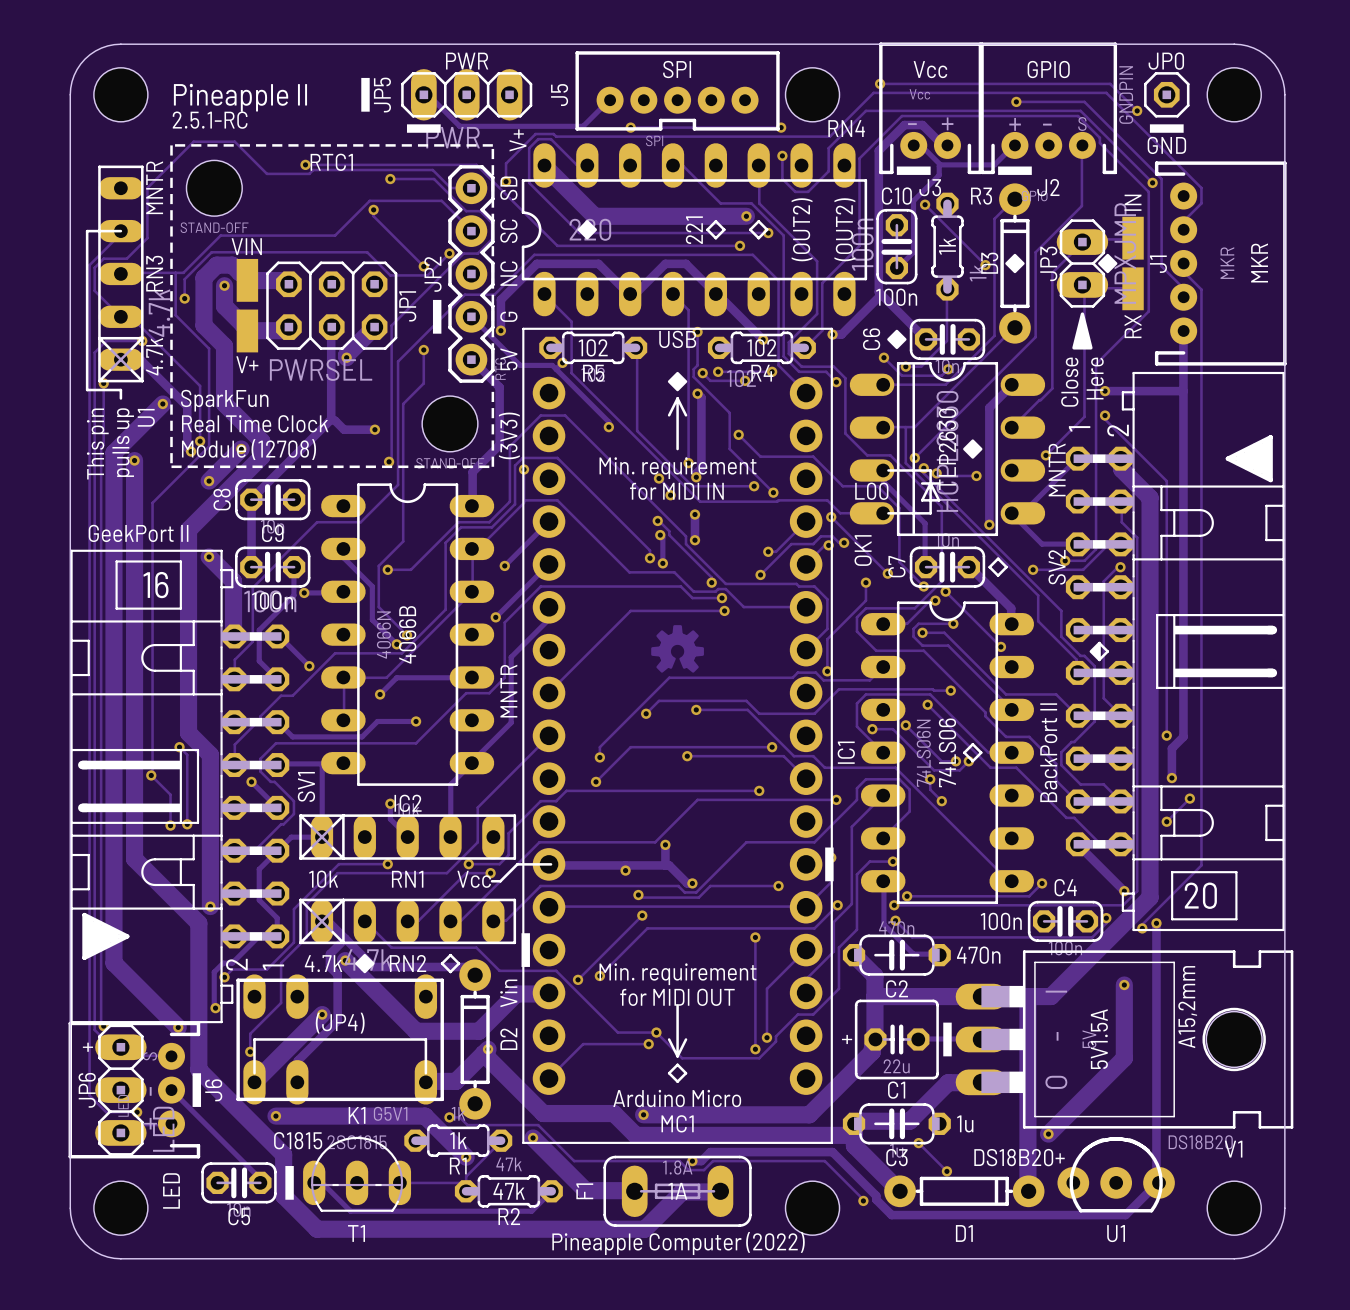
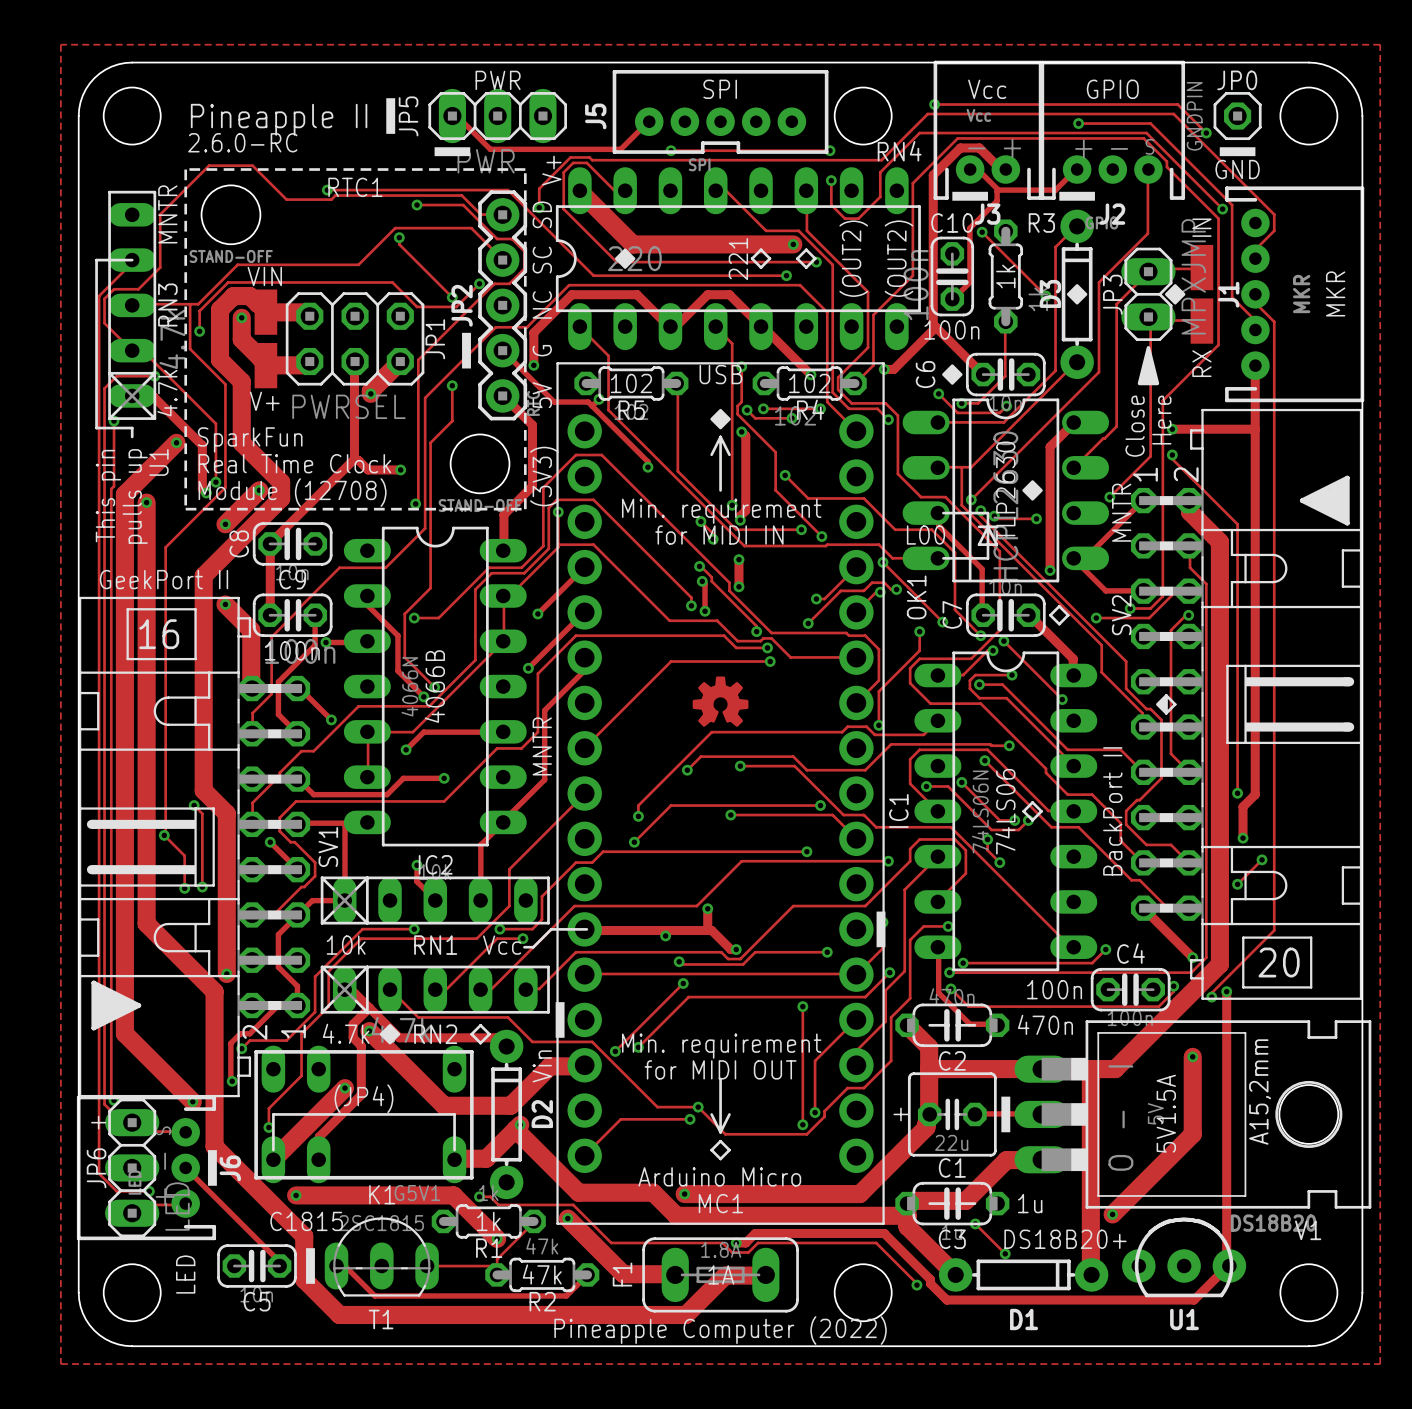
zone outline: none -> (60, 44) (1380, 44) (1380, 1364) (60, 1364) (60, 44)
text: 2.5.1-RC (210, 120) -> 2.6.0-RC (242, 142)

